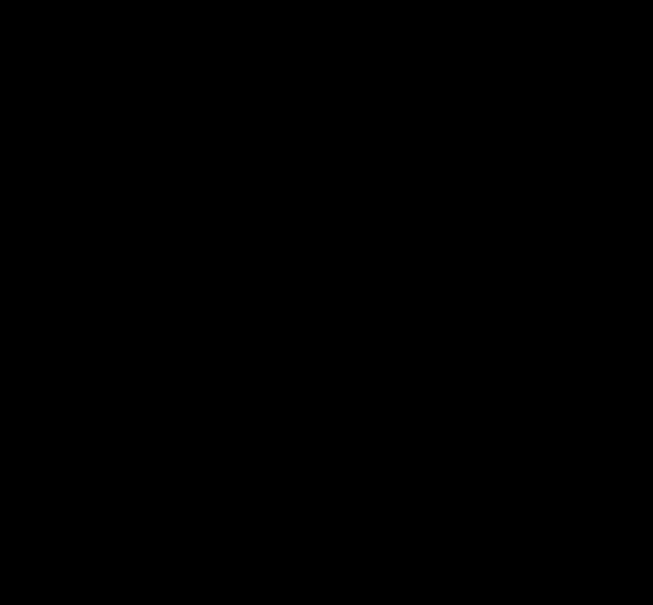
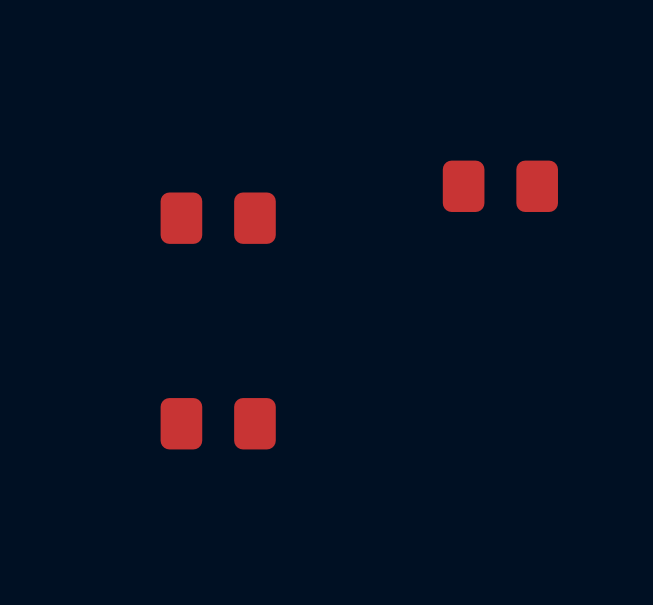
part: none -> (500, 186)
part: none -> (218, 218)
part: none -> (218, 423)

